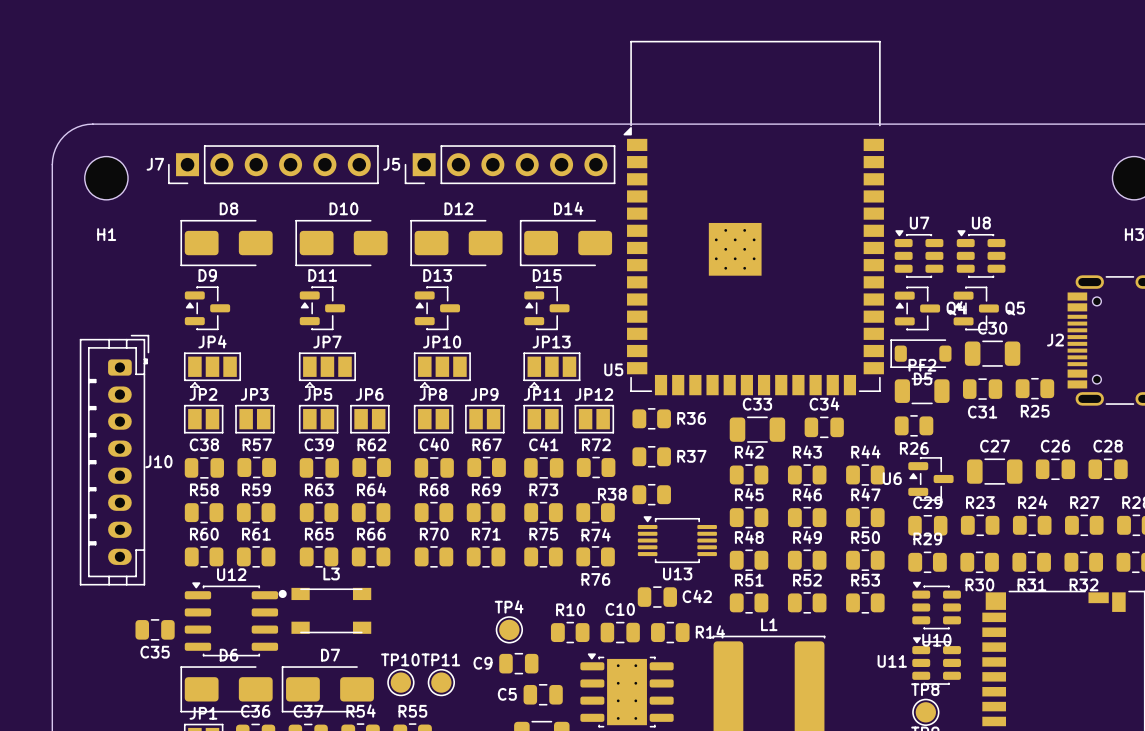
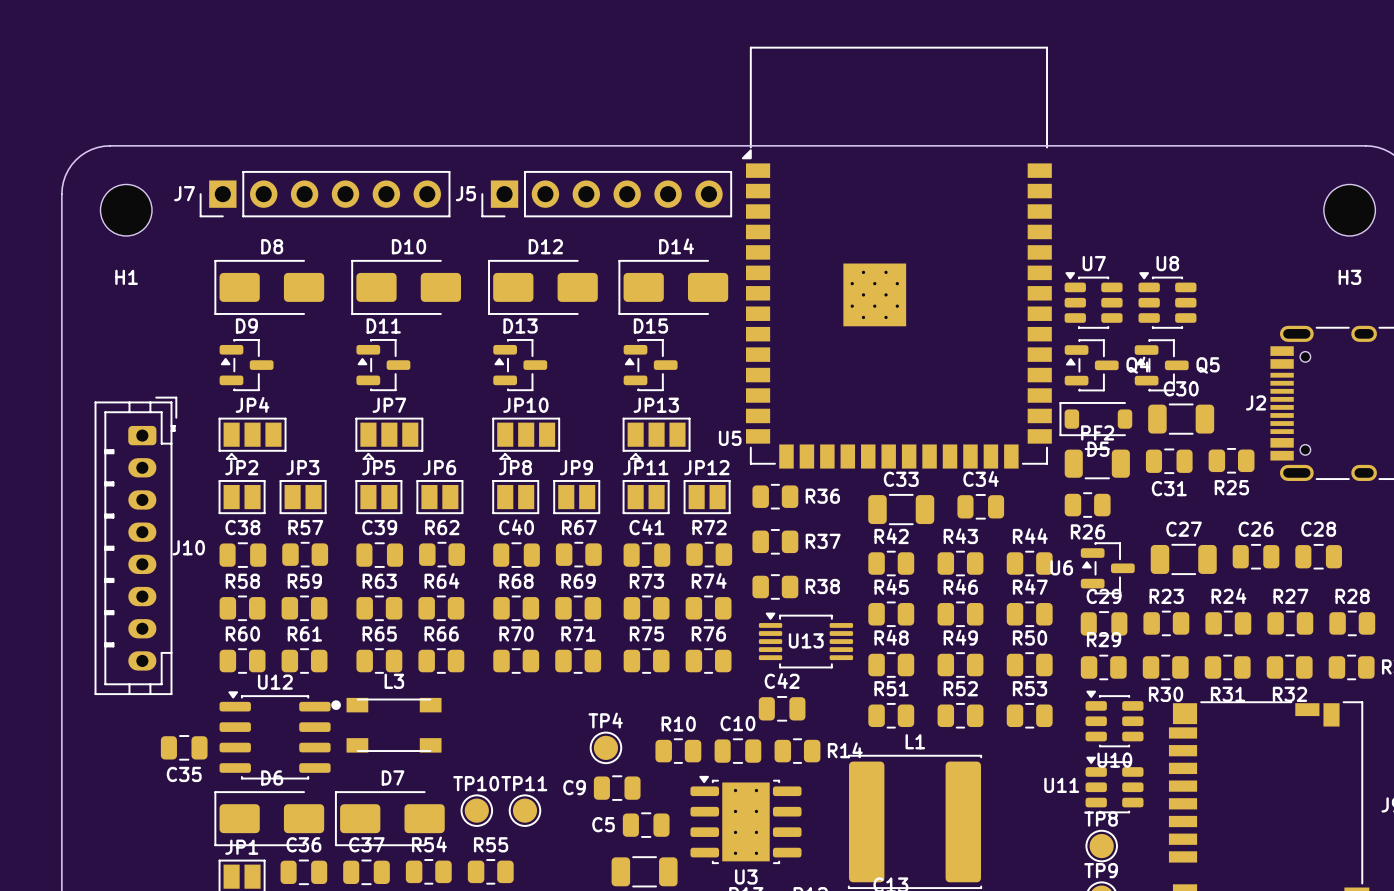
R38 name position: R38 (612, 494) -> R38 (822, 586)
R74 name position: R74 (596, 534) -> R74 (709, 580)
U13 name position: U13 (677, 573) -> U13 (806, 640)
R76 name position: R76 (595, 579) -> R76 (708, 633)
C42 name position: C42 (697, 596) -> C42 (782, 681)

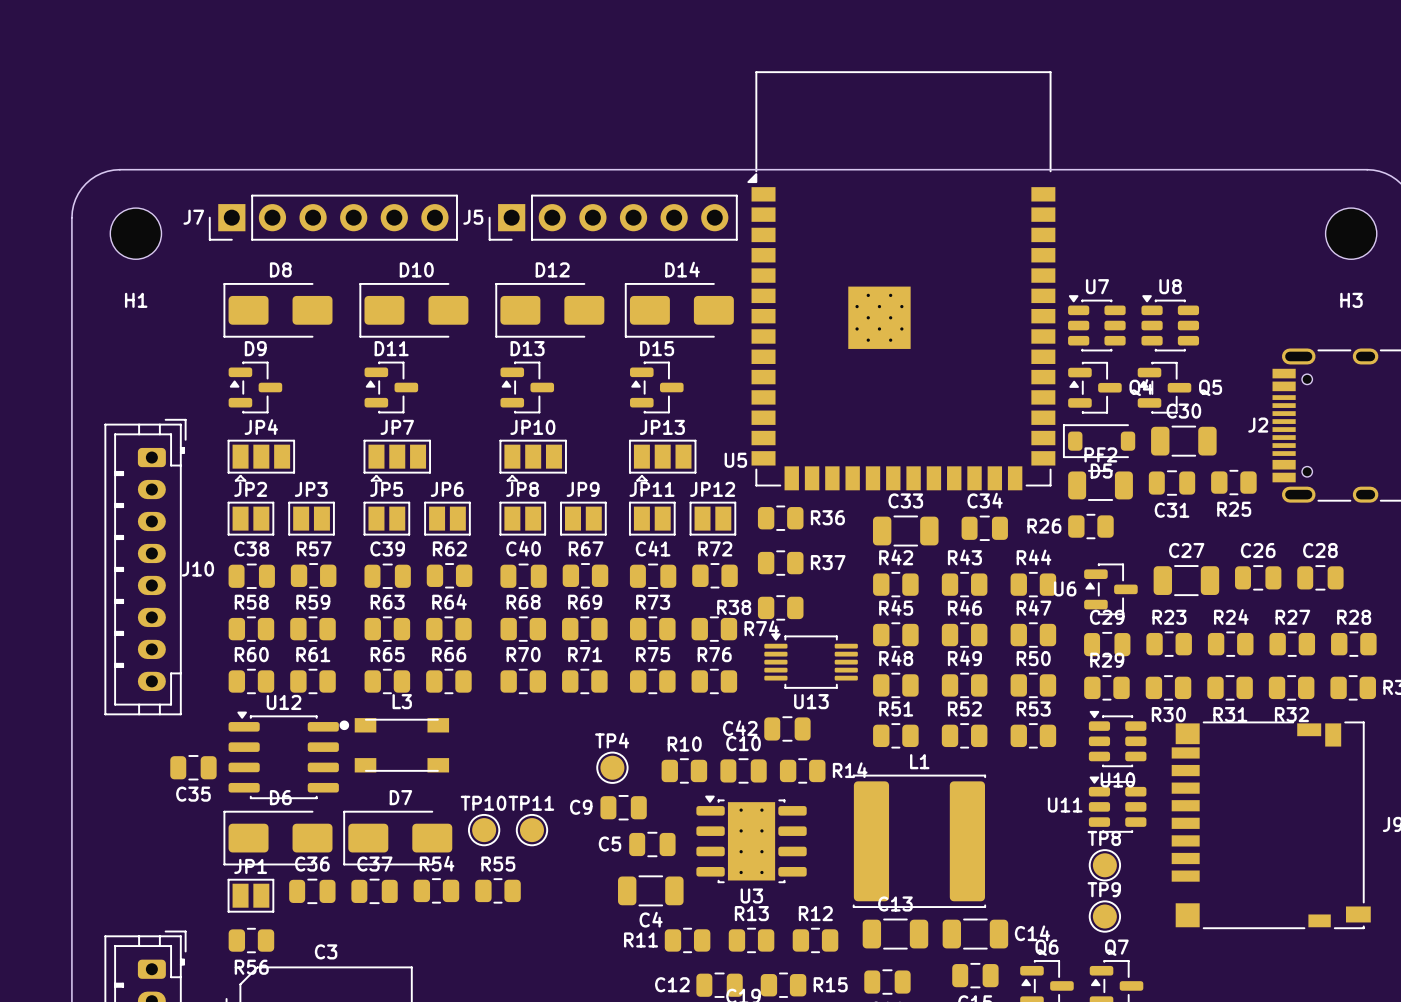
R26 name position: R26 (1087, 531) -> R26 (1044, 526)
R74 name position: R74 (709, 580) -> R74 (761, 628)
R38 name position: R38 (822, 586) -> R38 (734, 607)
U13 name position: U13 (806, 640) -> U13 (811, 701)
C42 name position: C42 (782, 681) -> C42 (740, 728)

